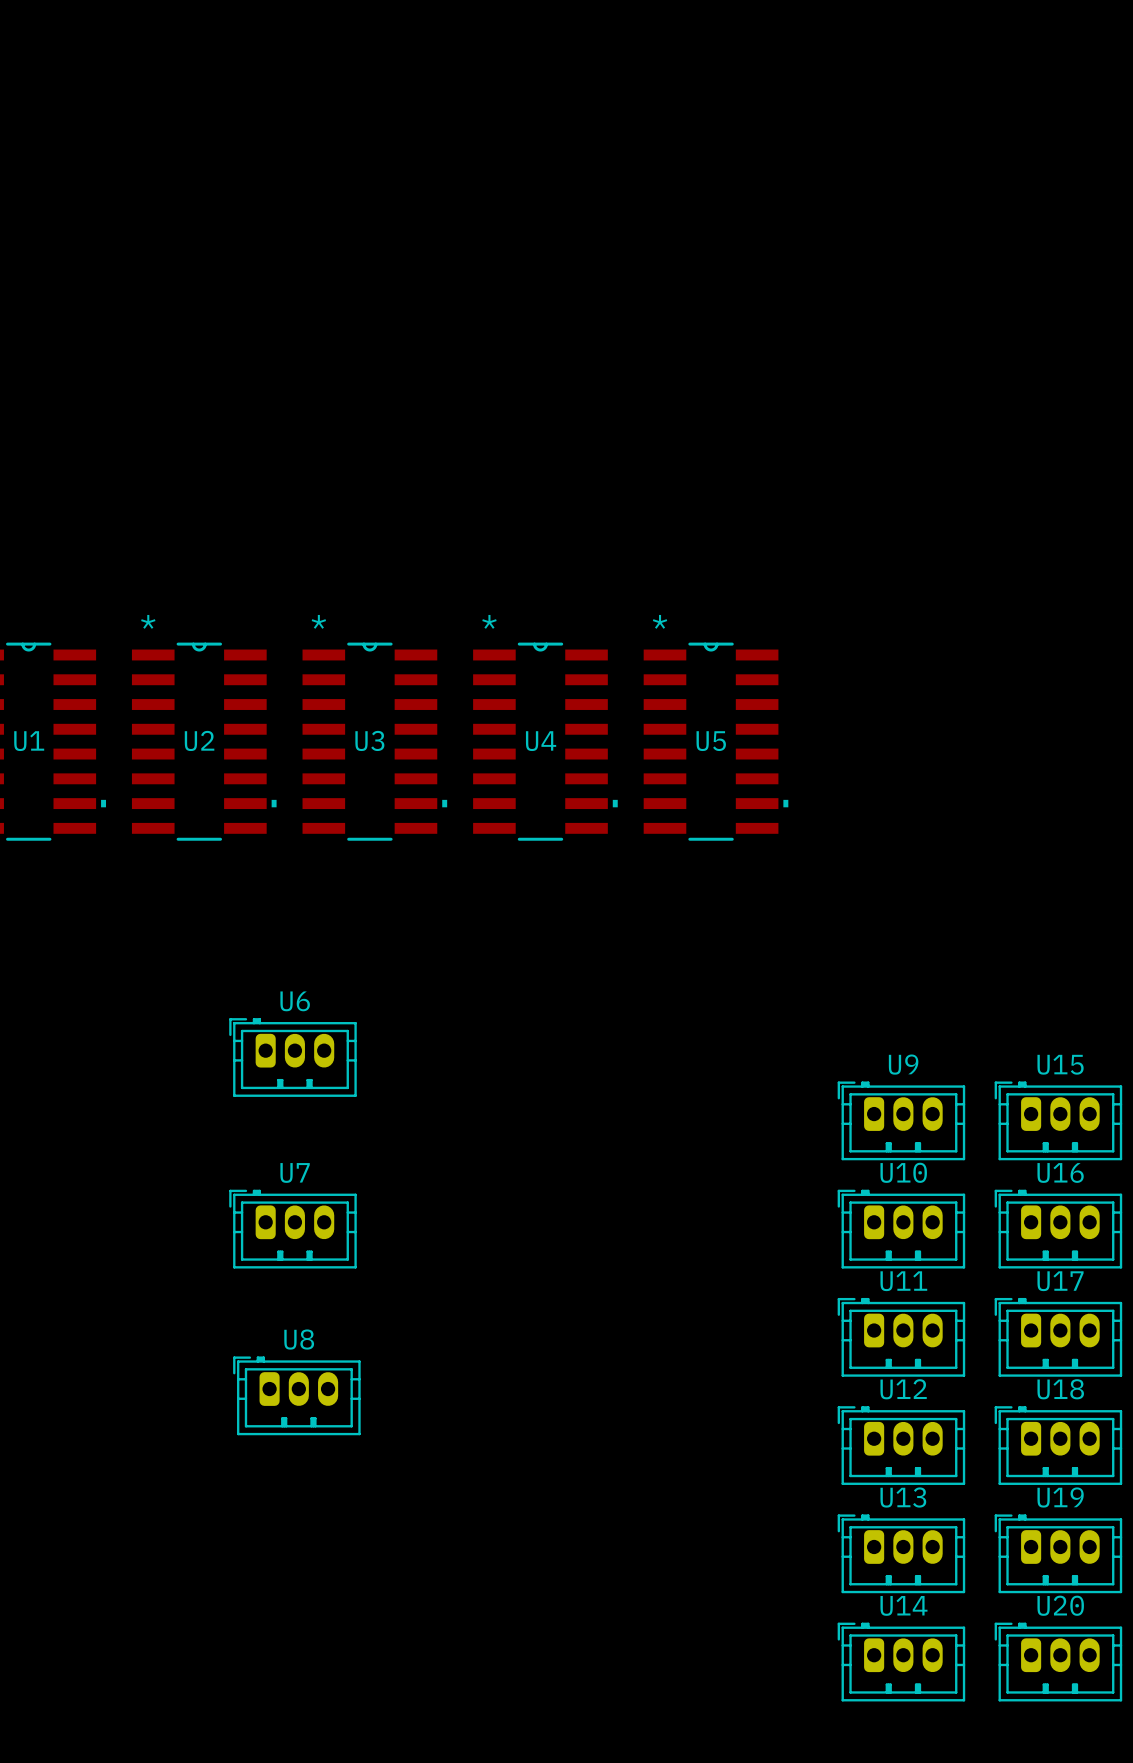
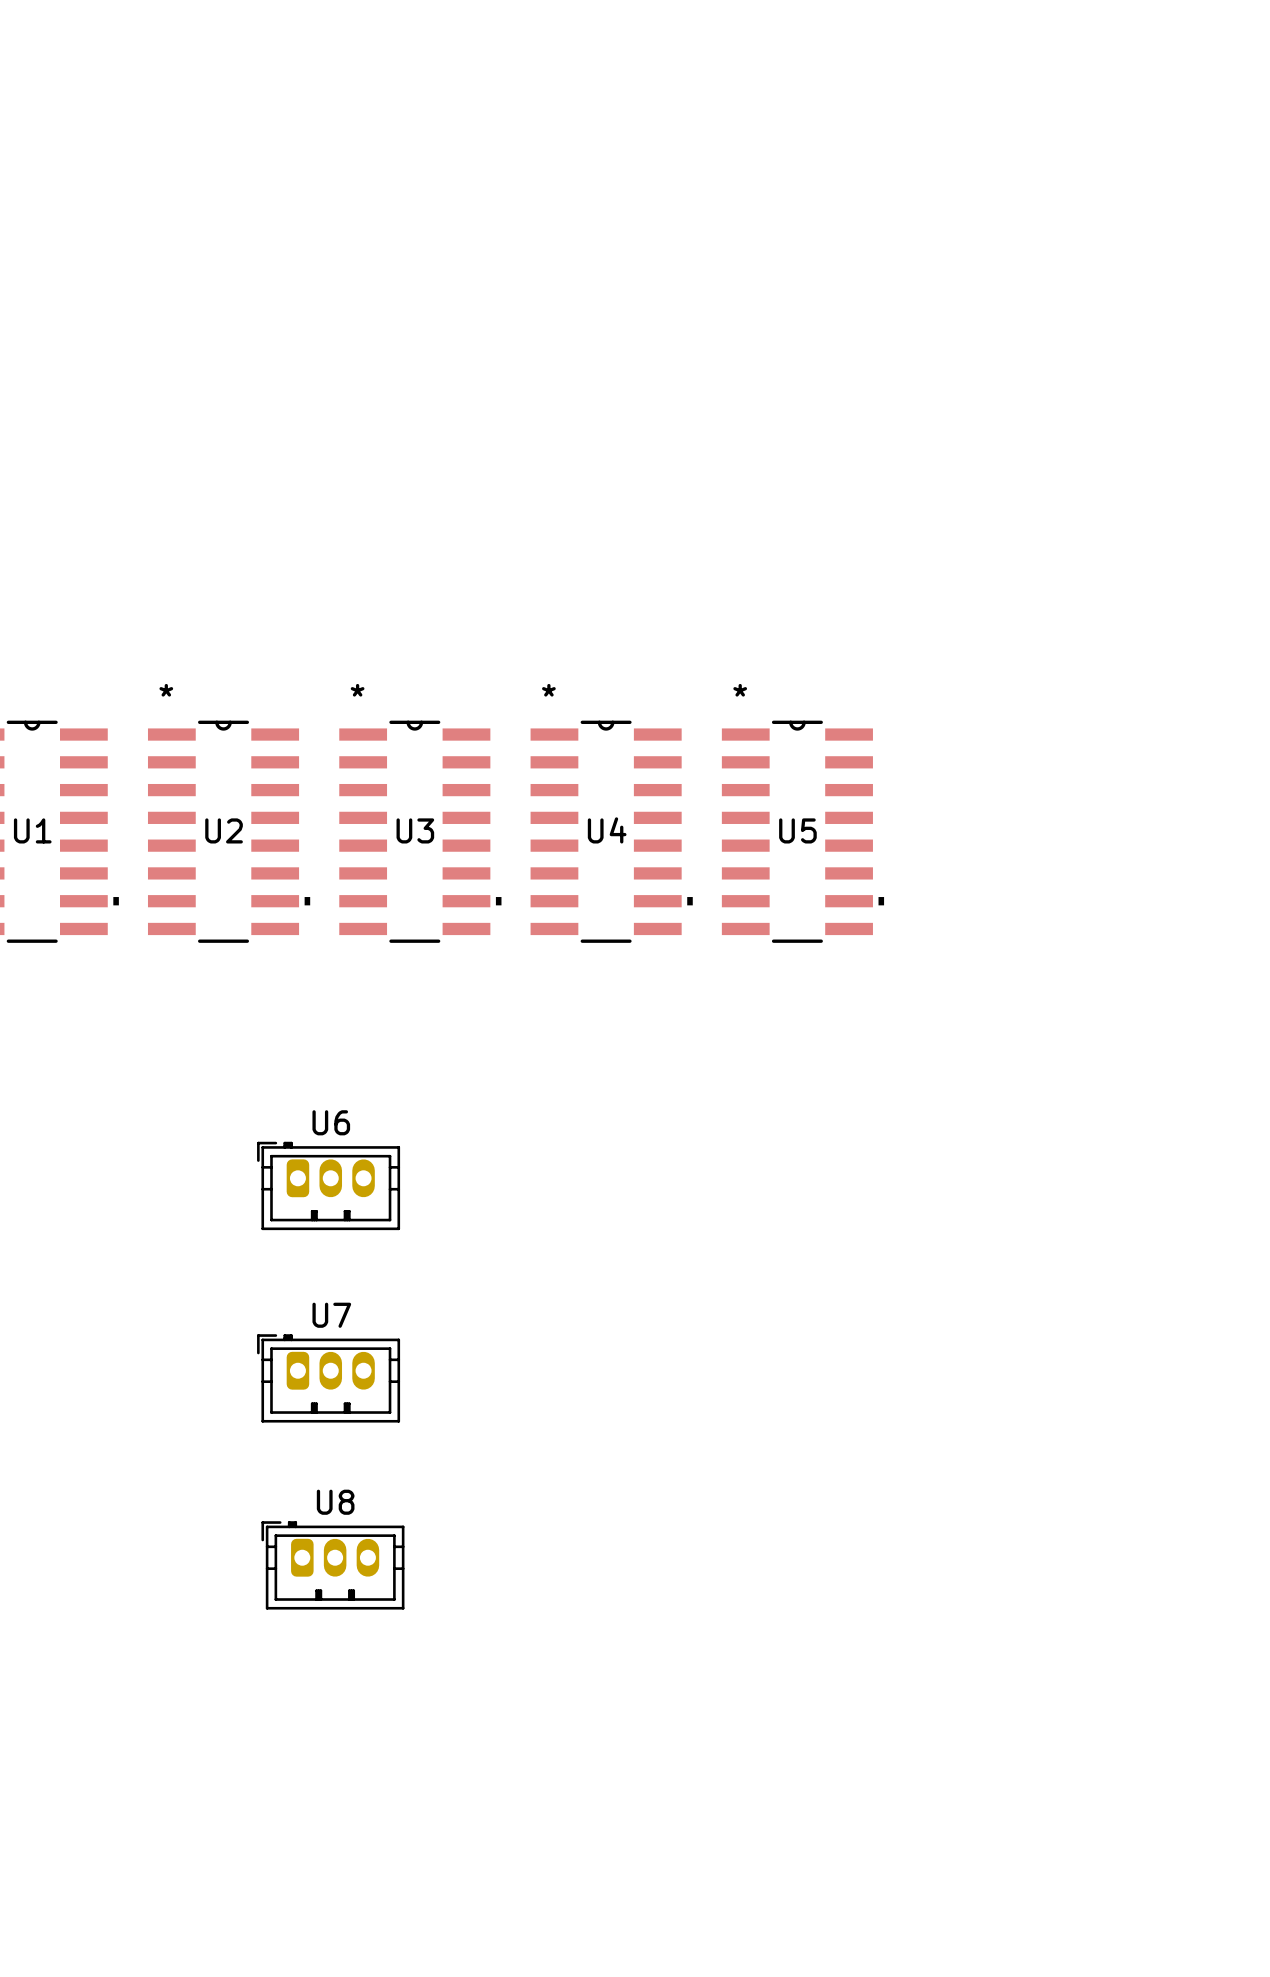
U9: (901, 1120) -> none
U15: (1058, 1120) -> none
U10: (901, 1229) -> none
U16: (1058, 1229) -> none
U11: (901, 1337) -> none
U17: (1058, 1337) -> none
U12: (901, 1445) -> none
U18: (1058, 1445) -> none
U13: (901, 1553) -> none
U19: (1058, 1553) -> none
U14: (901, 1662) -> none
U20: (1058, 1662) -> none

